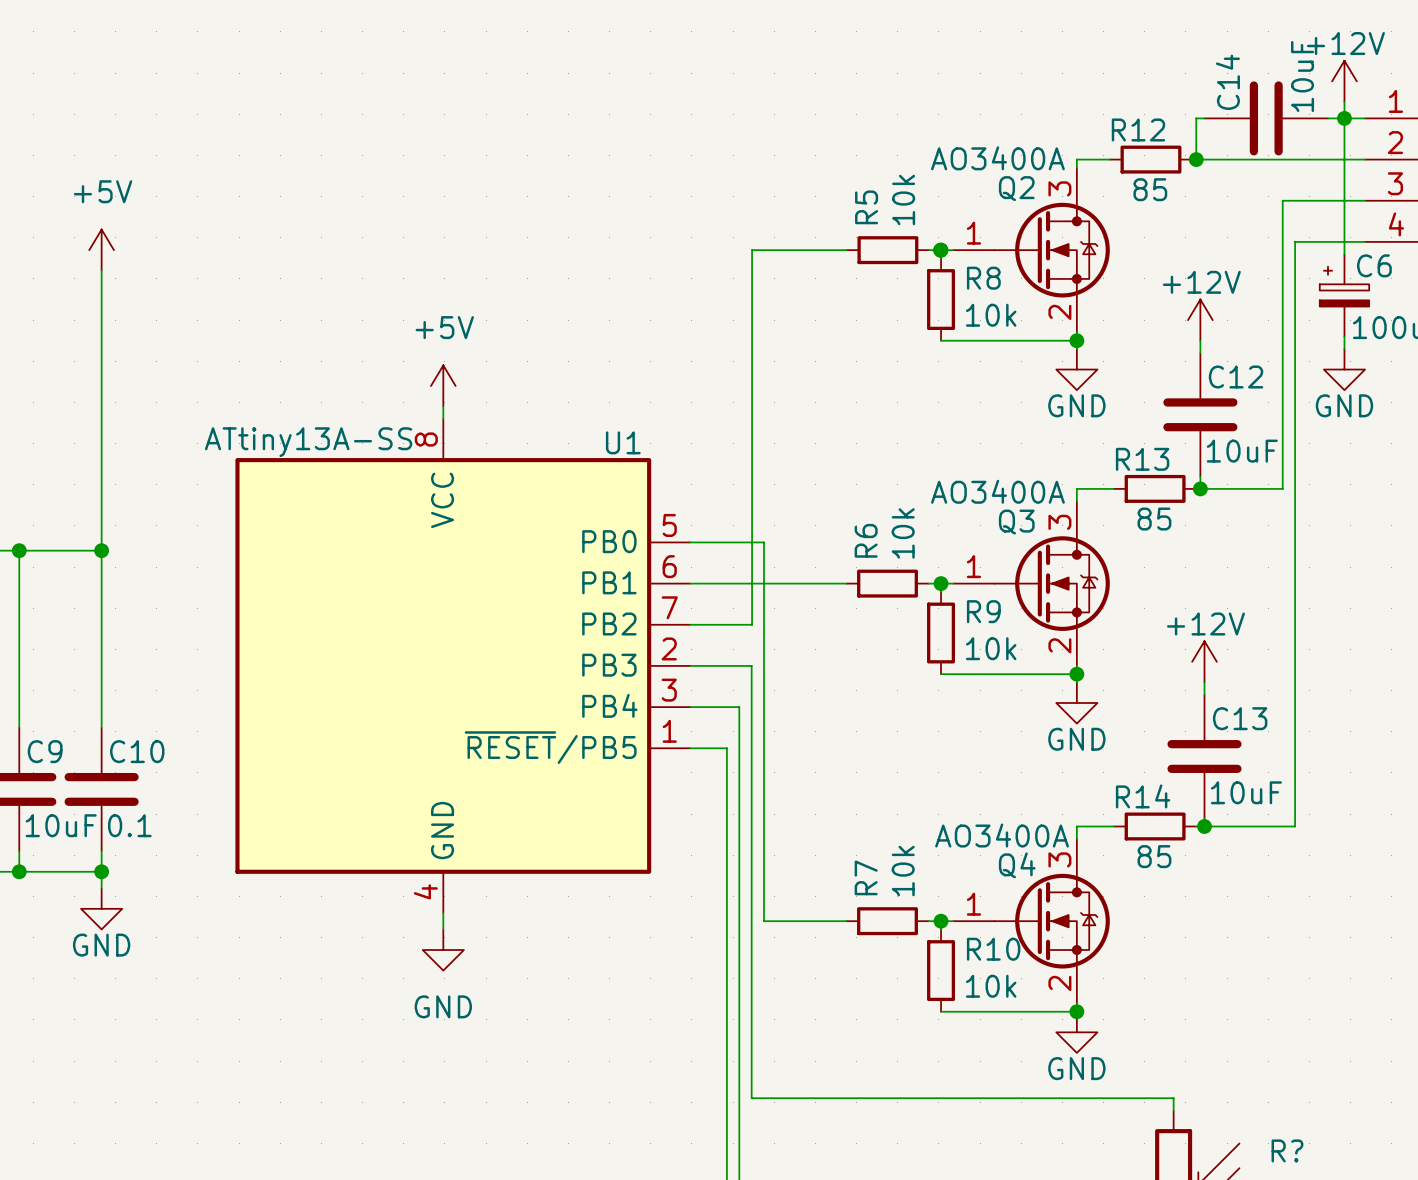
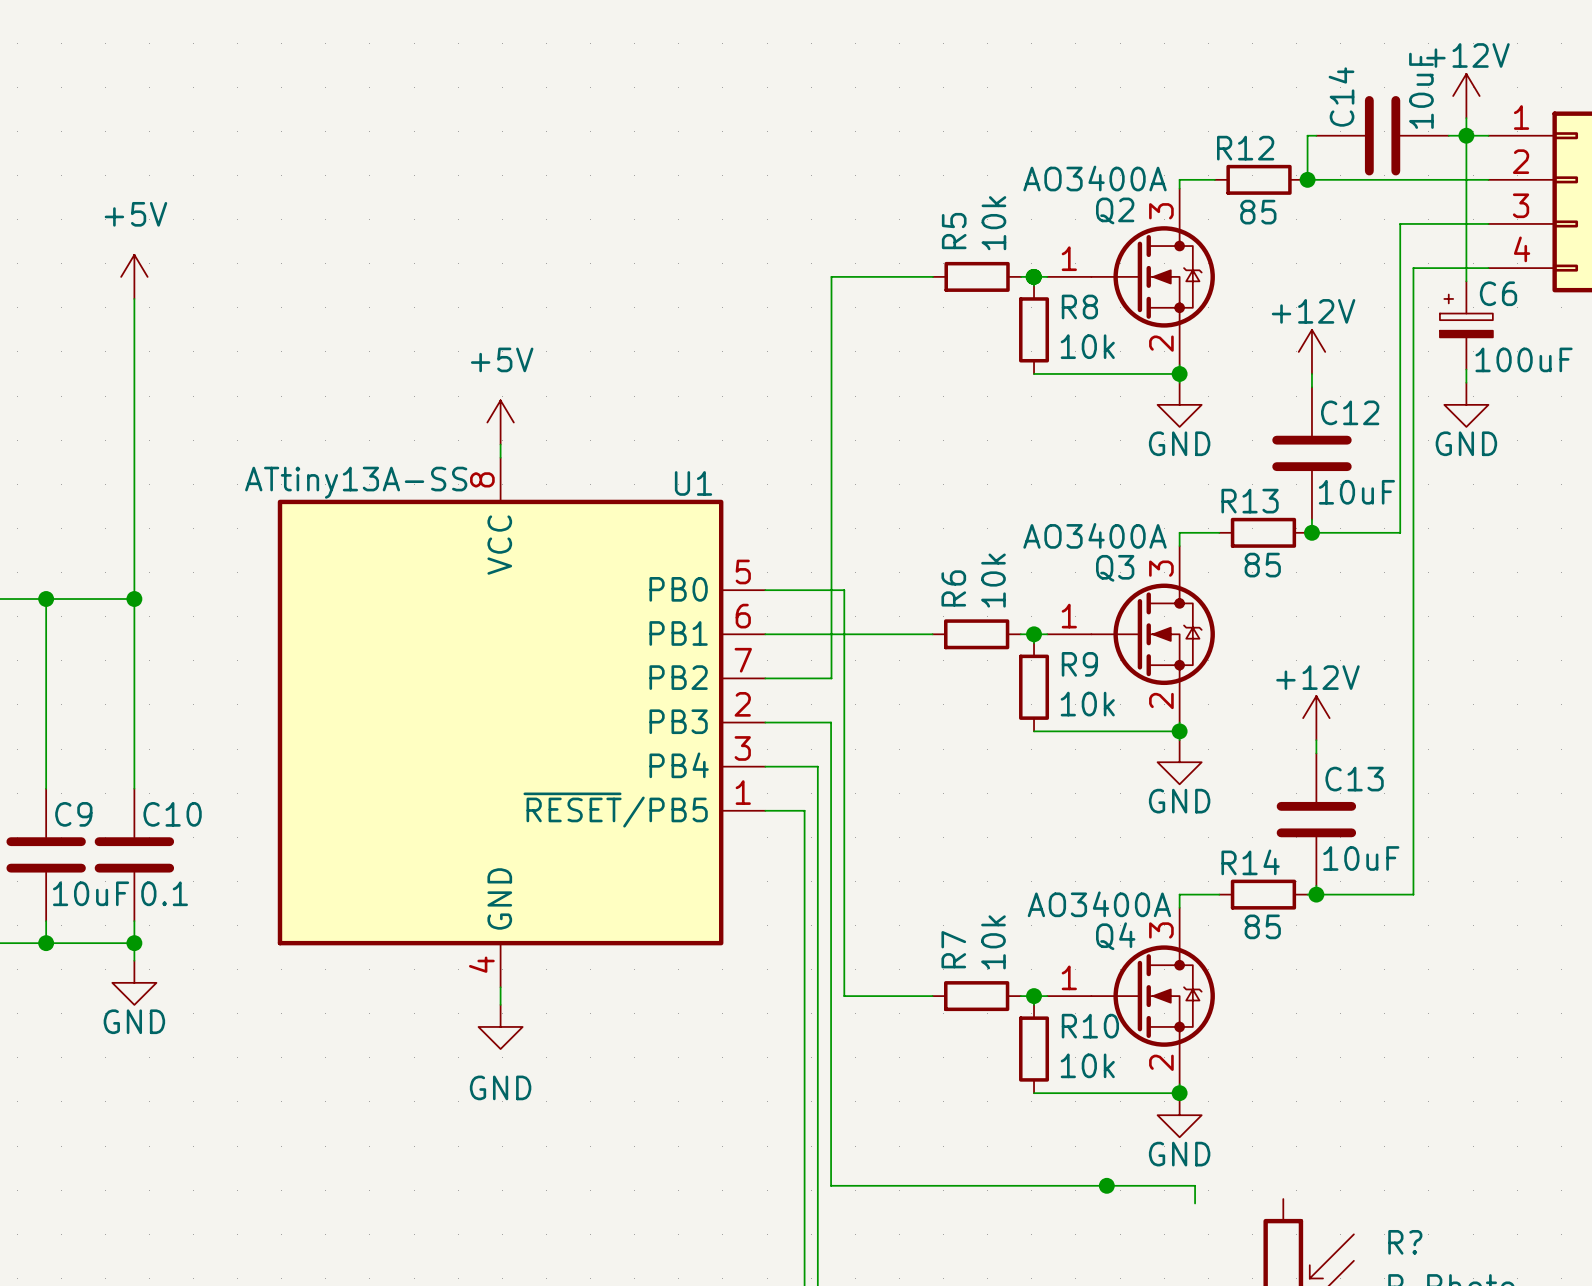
junction: none -> (1106, 1185)
wire: (1091, 1098) (1173, 1098) (1173, 1110) -> (1195, 1185) (1195, 1203)

